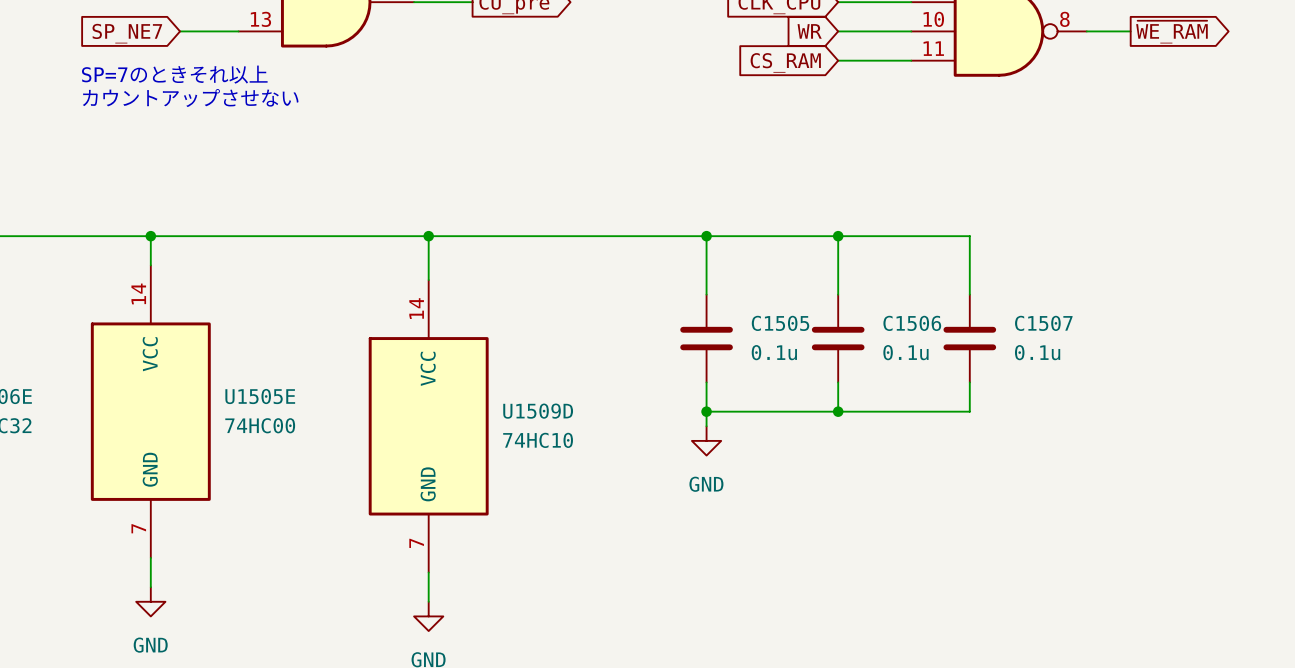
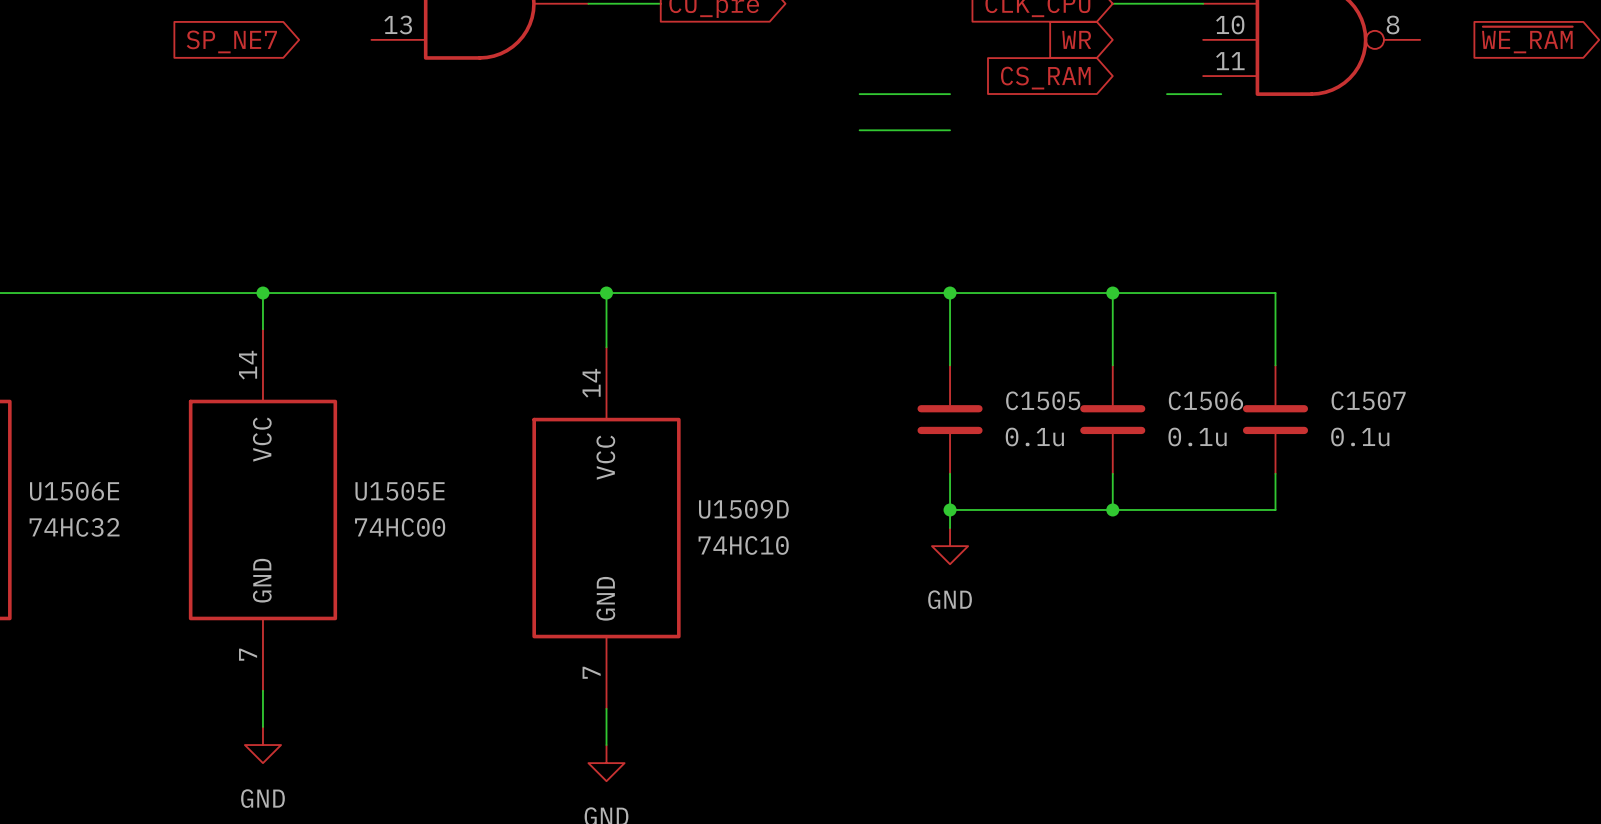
wire: (180, 31) (238, 31) -> none
wire: (838, 31) (911, 31) -> (859, 94) (950, 94)
wire: (1086, 31) (1130, 31) -> (1167, 94) (1221, 94)
wire: (838, 60) (911, 60) -> (859, 130) (950, 130)
text: SP=7のときそれ以上 (174, 74) -> none
text: カウントアップさせない (190, 98) -> none

